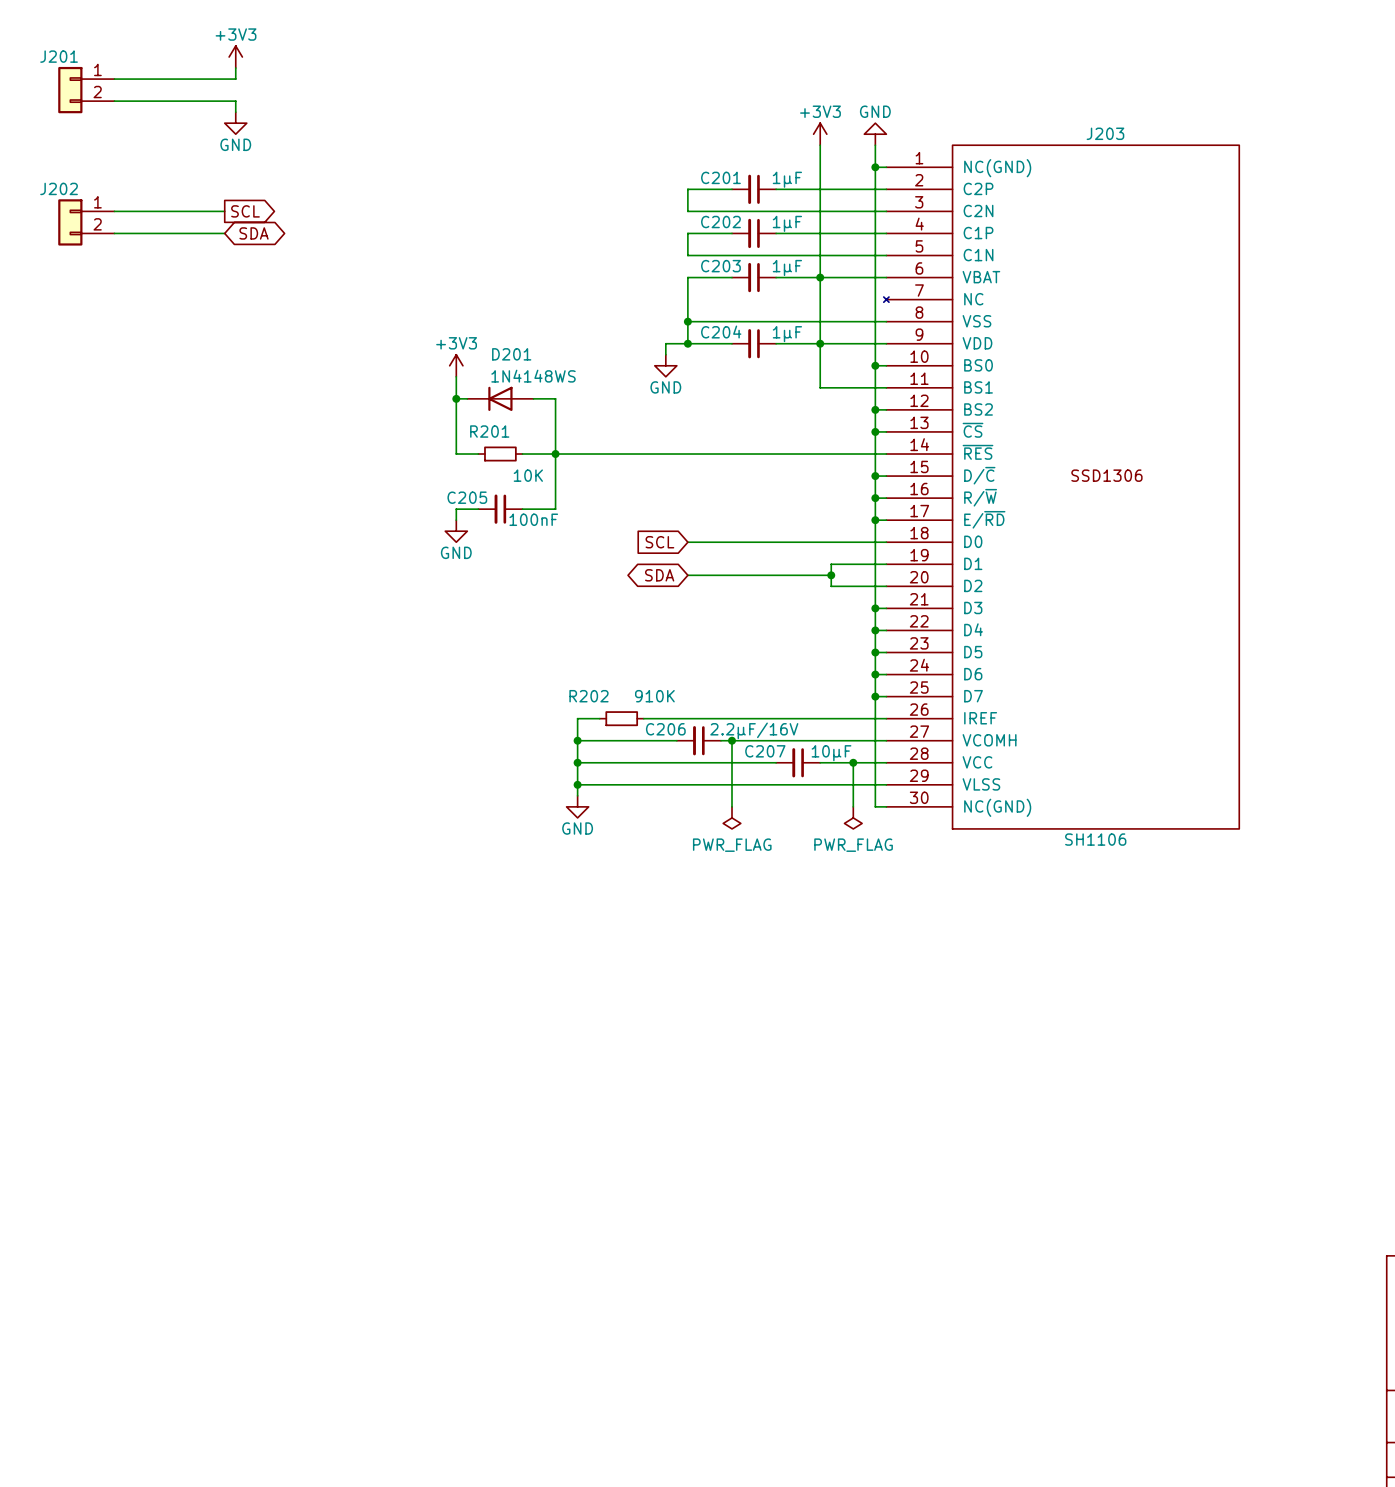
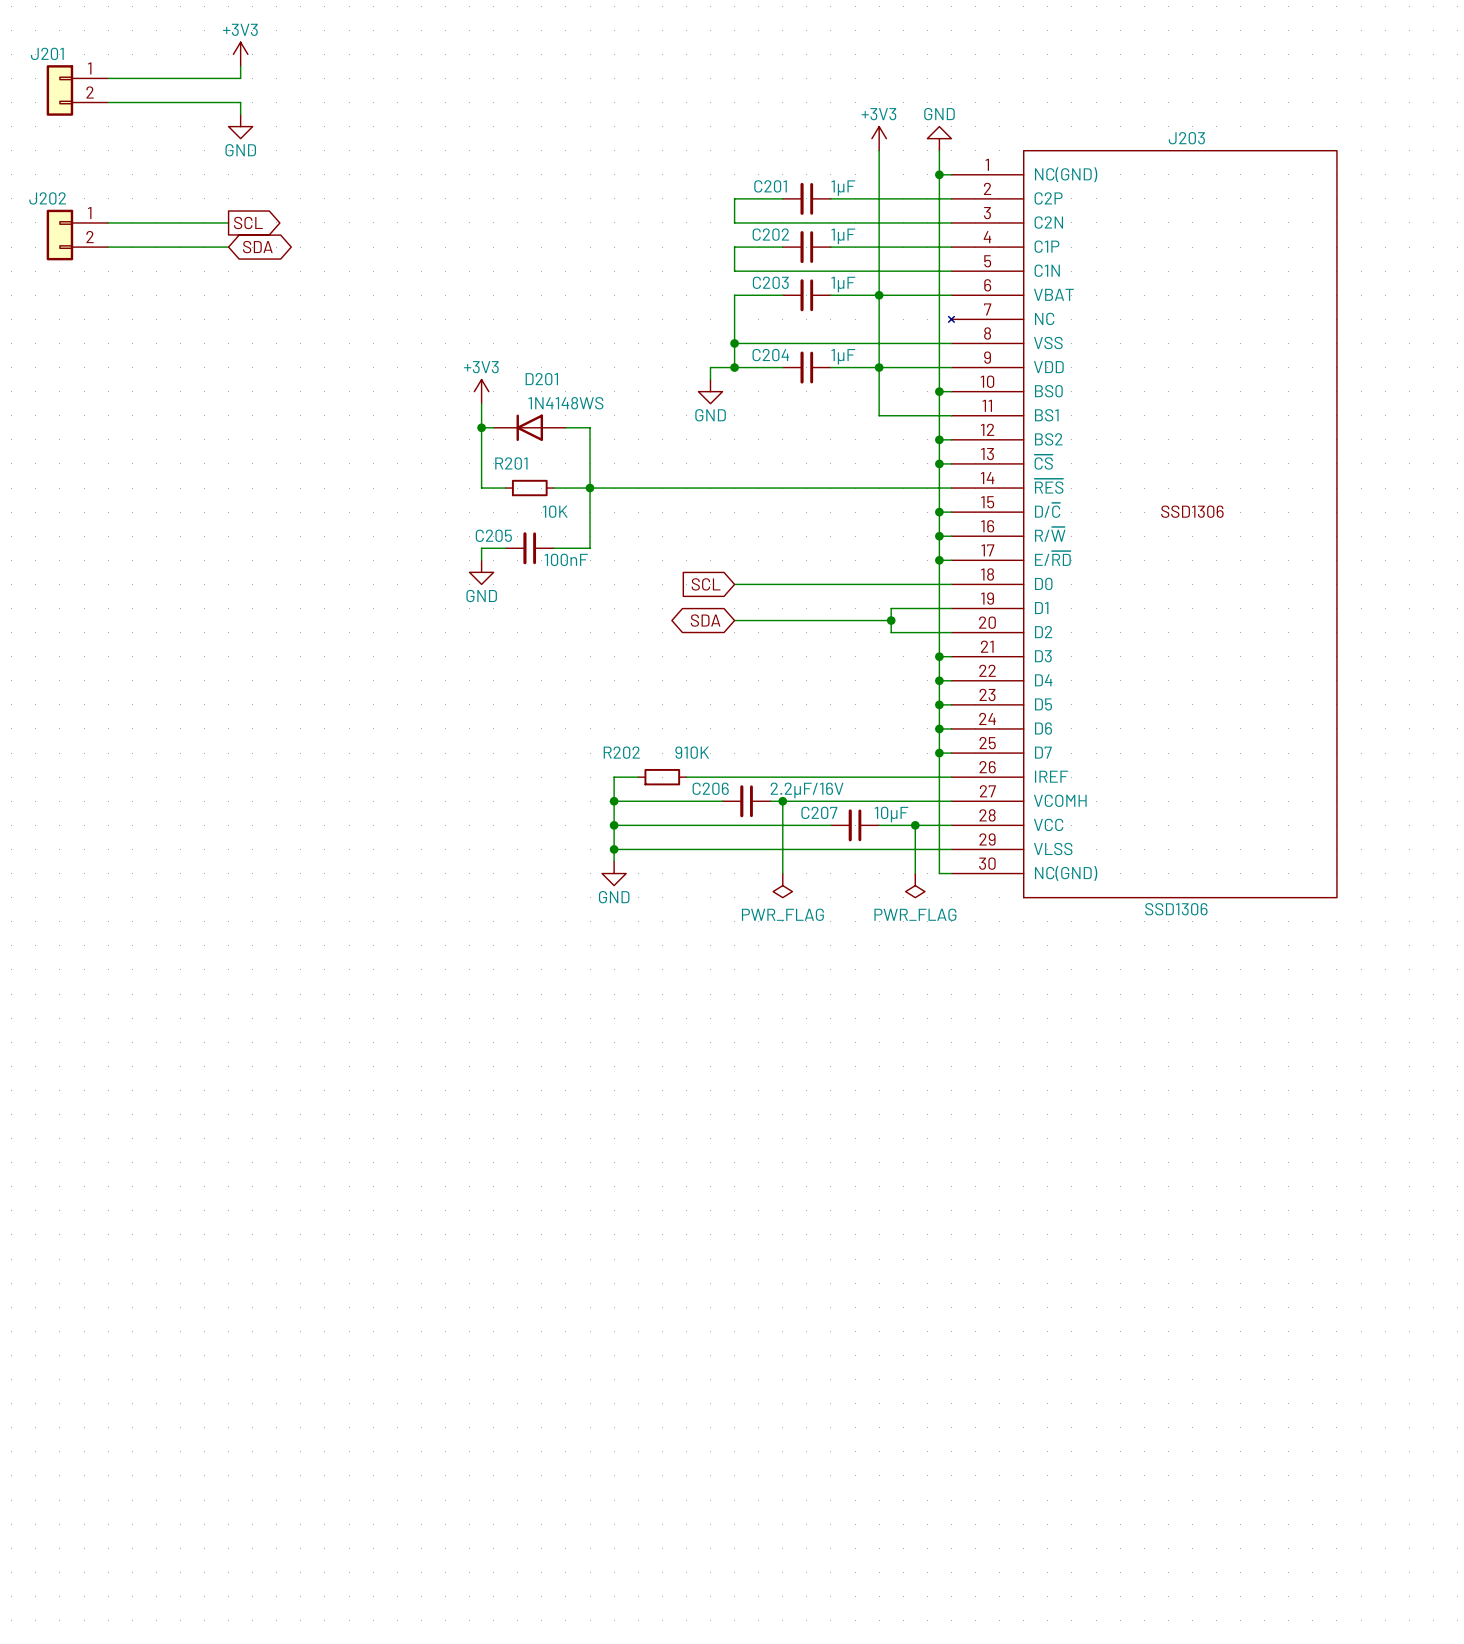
J203 value: SH1106 (1095, 839) -> SSD1306 (1176, 909)

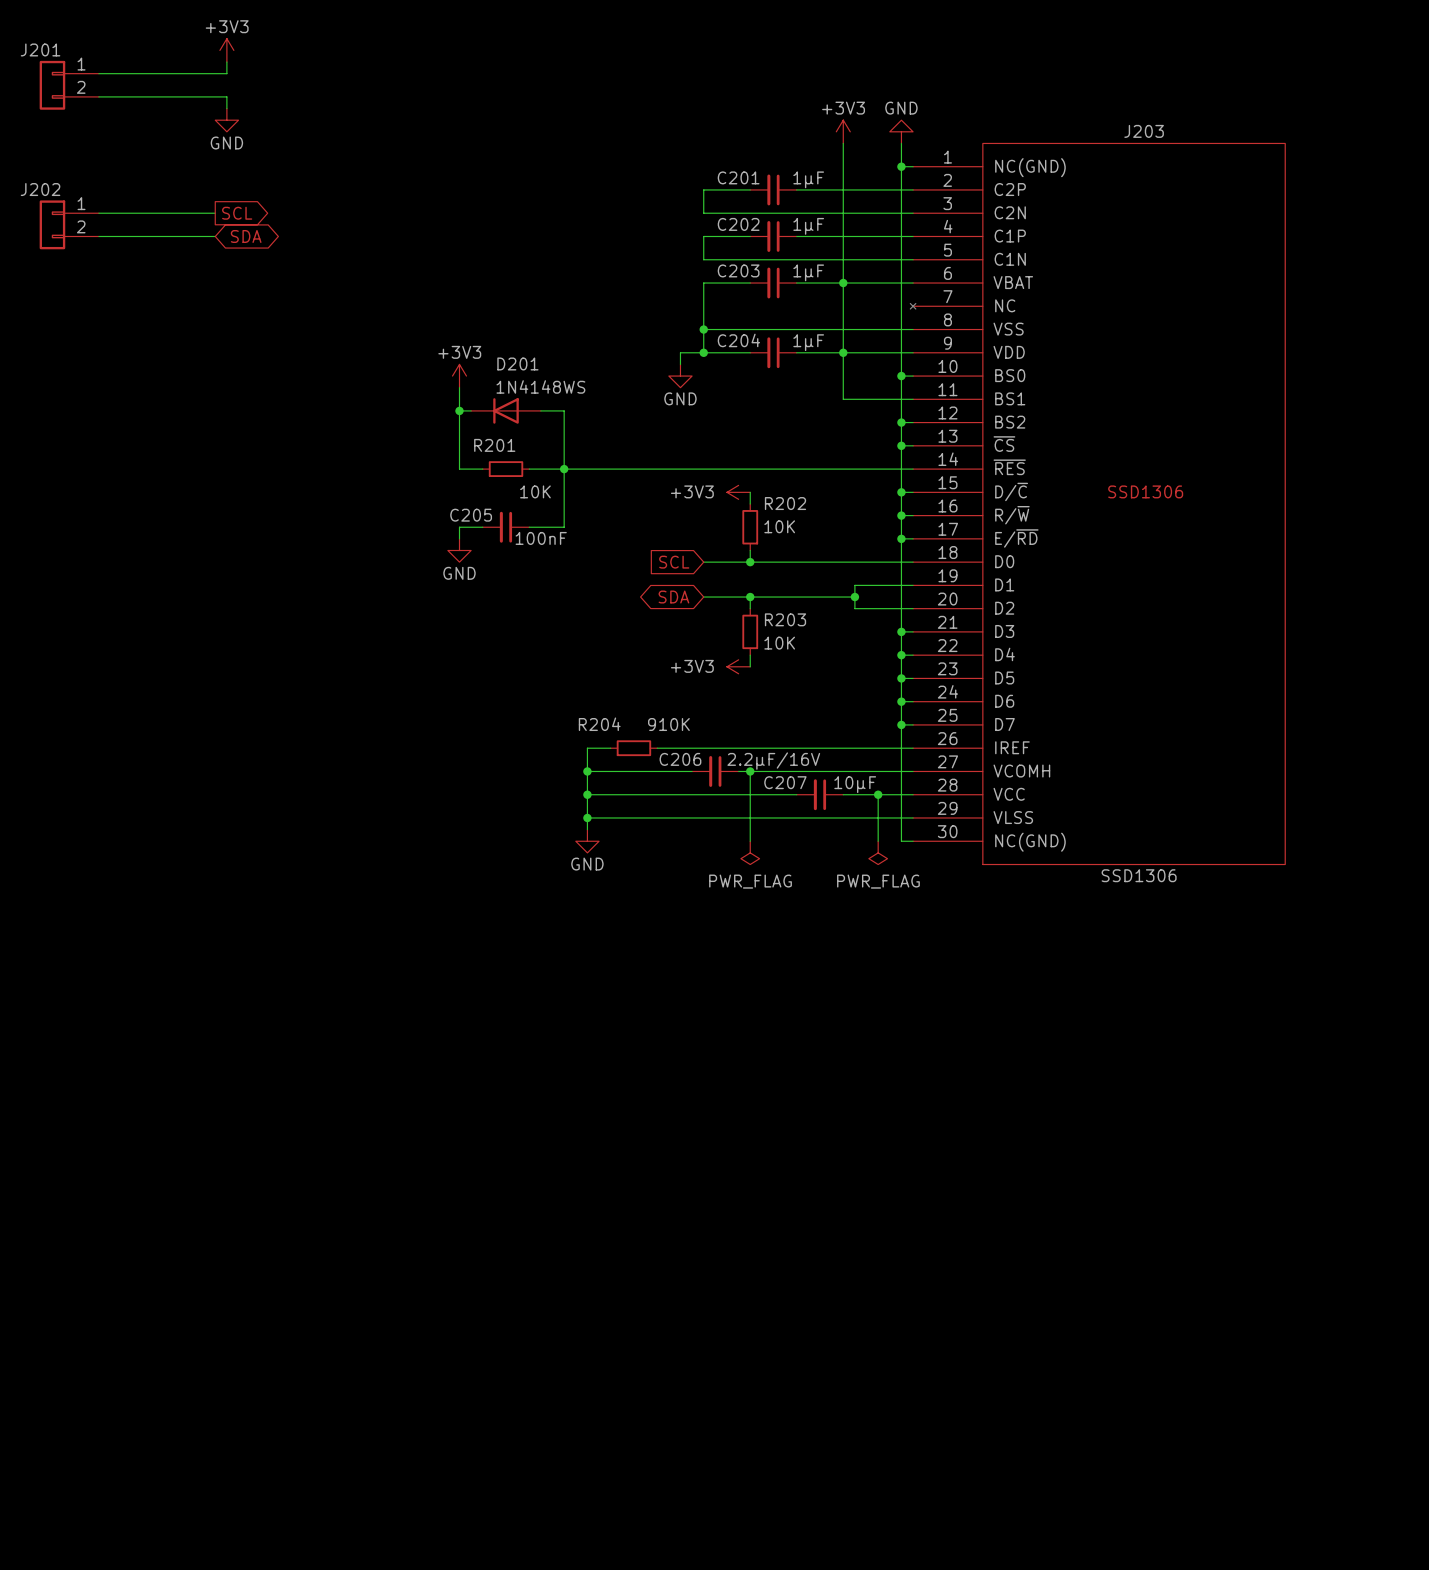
power symbol: none -> +3V3 (738, 492)
wire: none -> (750, 492) (750, 503)
R202: none -> 10K (750, 527)
wire: none -> (750, 550) (750, 562)
junction: none -> (750, 562)
wire: none -> (750, 597) (750, 608)
junction: none -> (750, 597)
R203: none -> 10K (750, 631)
wire: none -> (750, 655) (750, 666)
power symbol: none -> +3V3 (738, 666)
R202 name: R202 (621, 752) -> R204 (599, 724)

